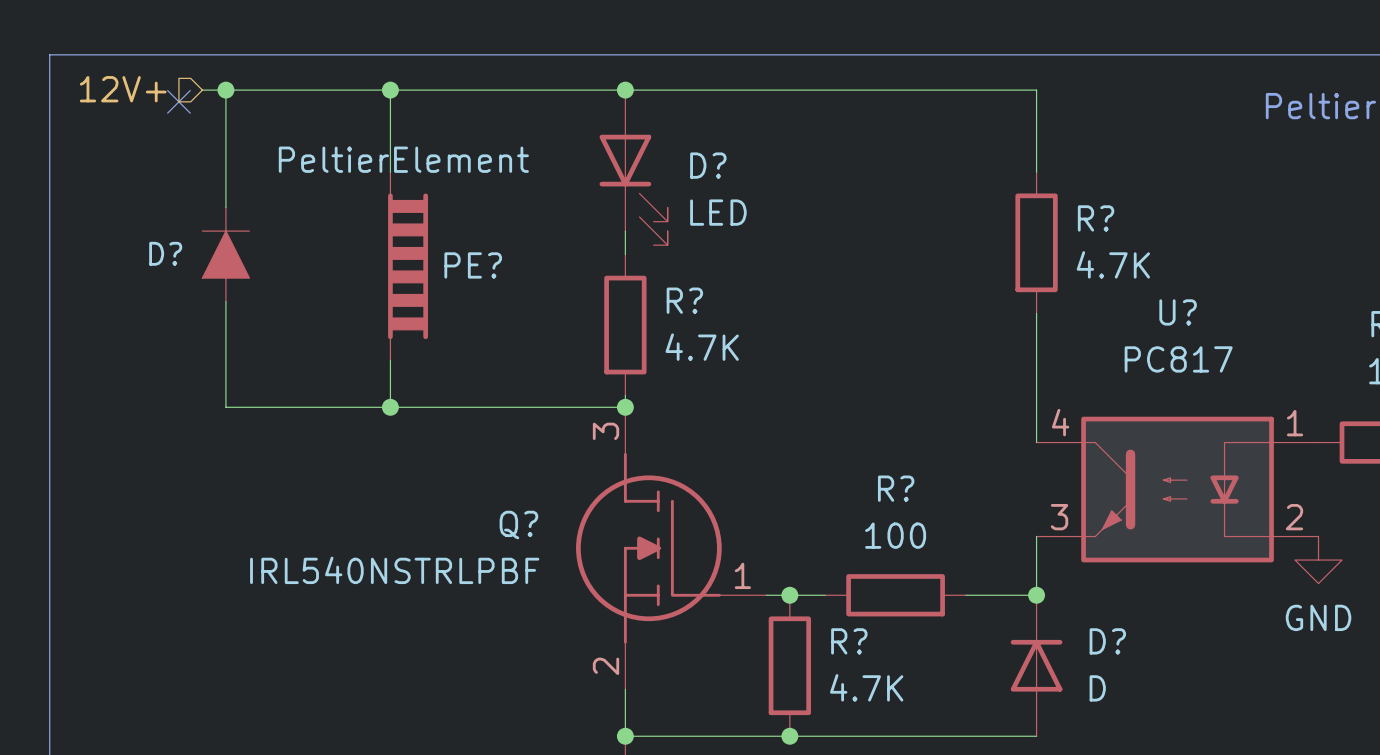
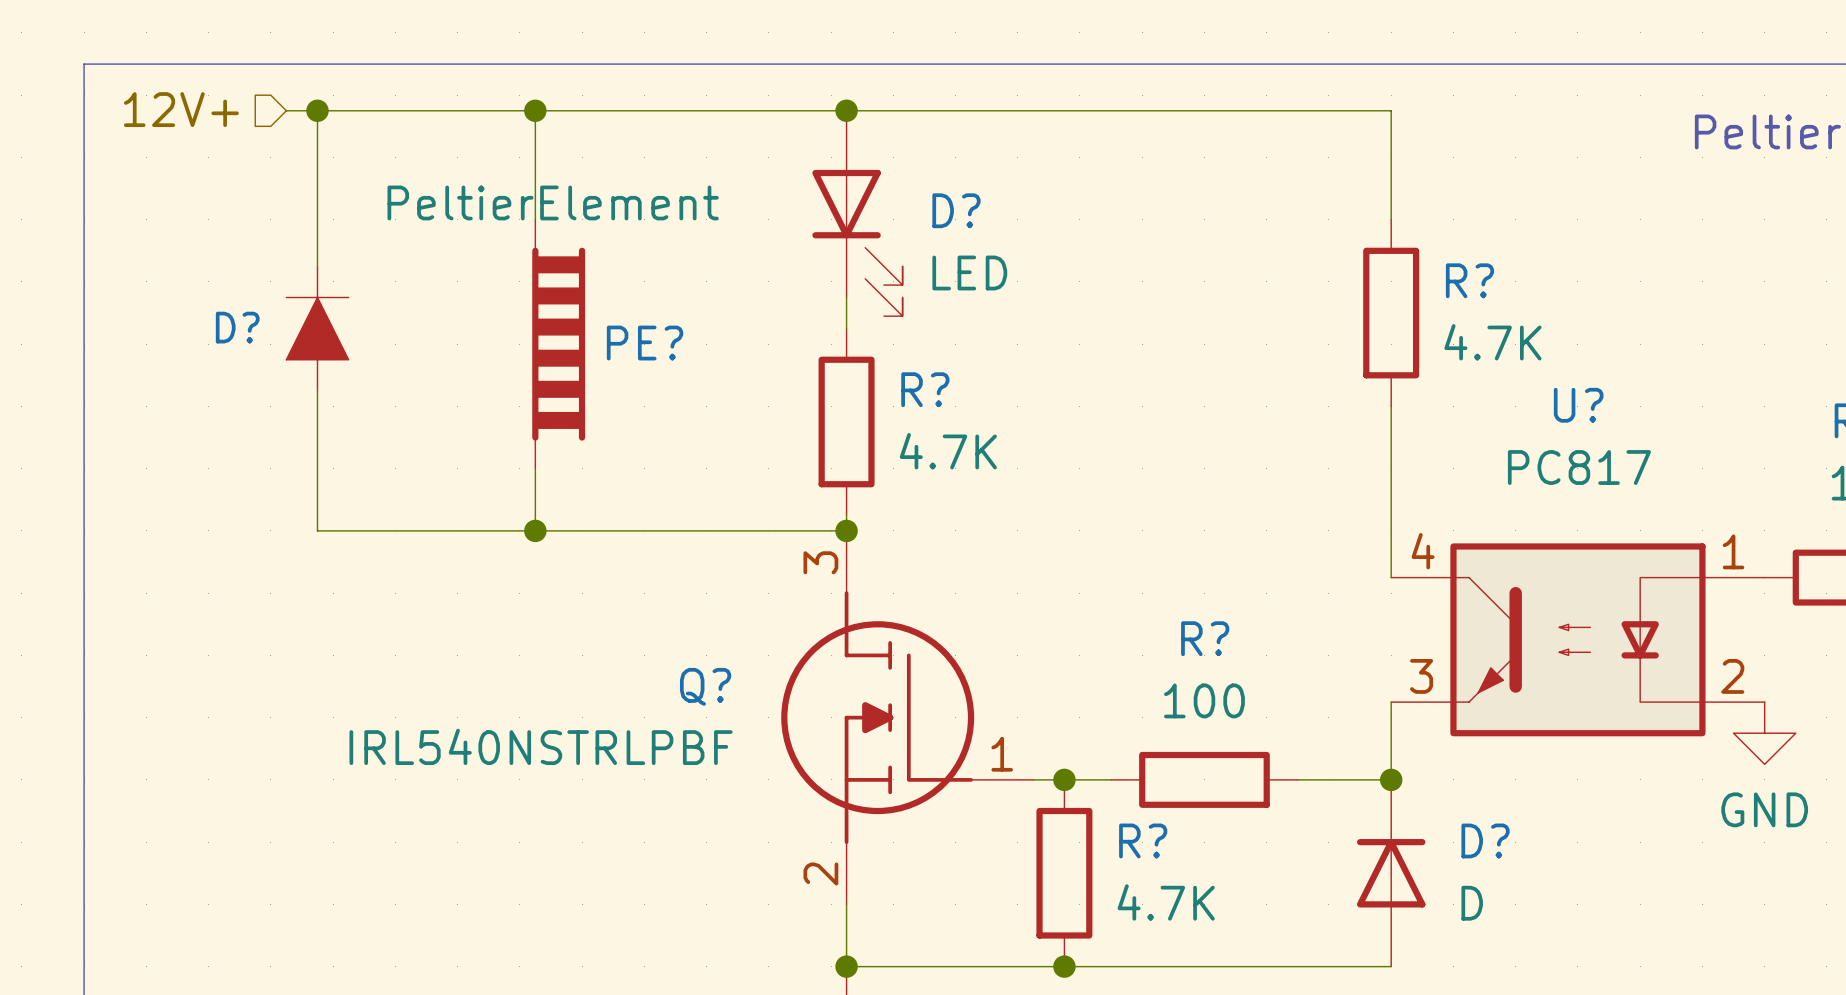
no-connect mark: (178, 101) -> none

